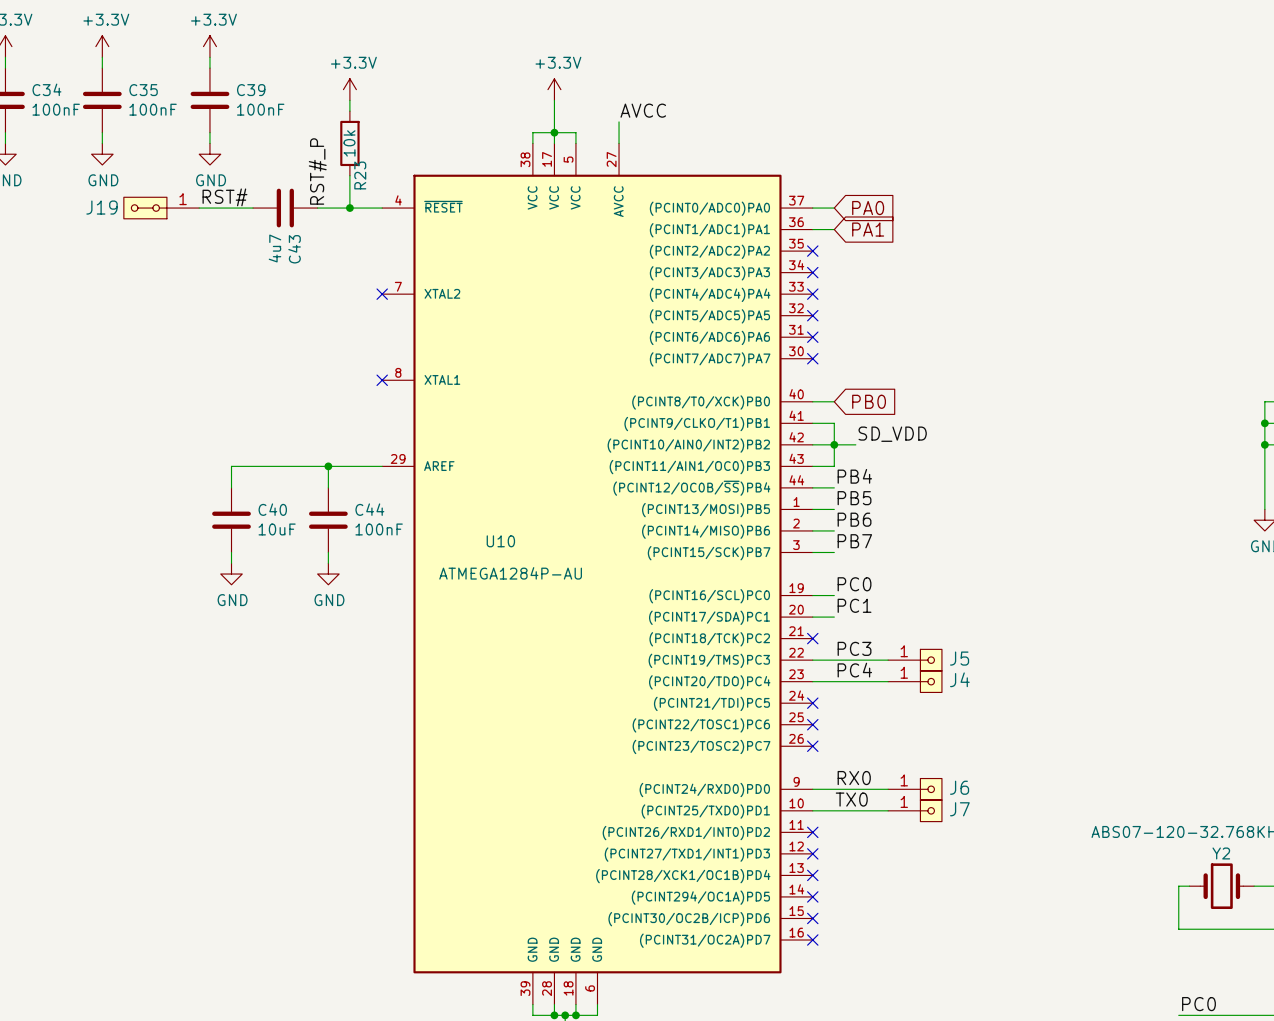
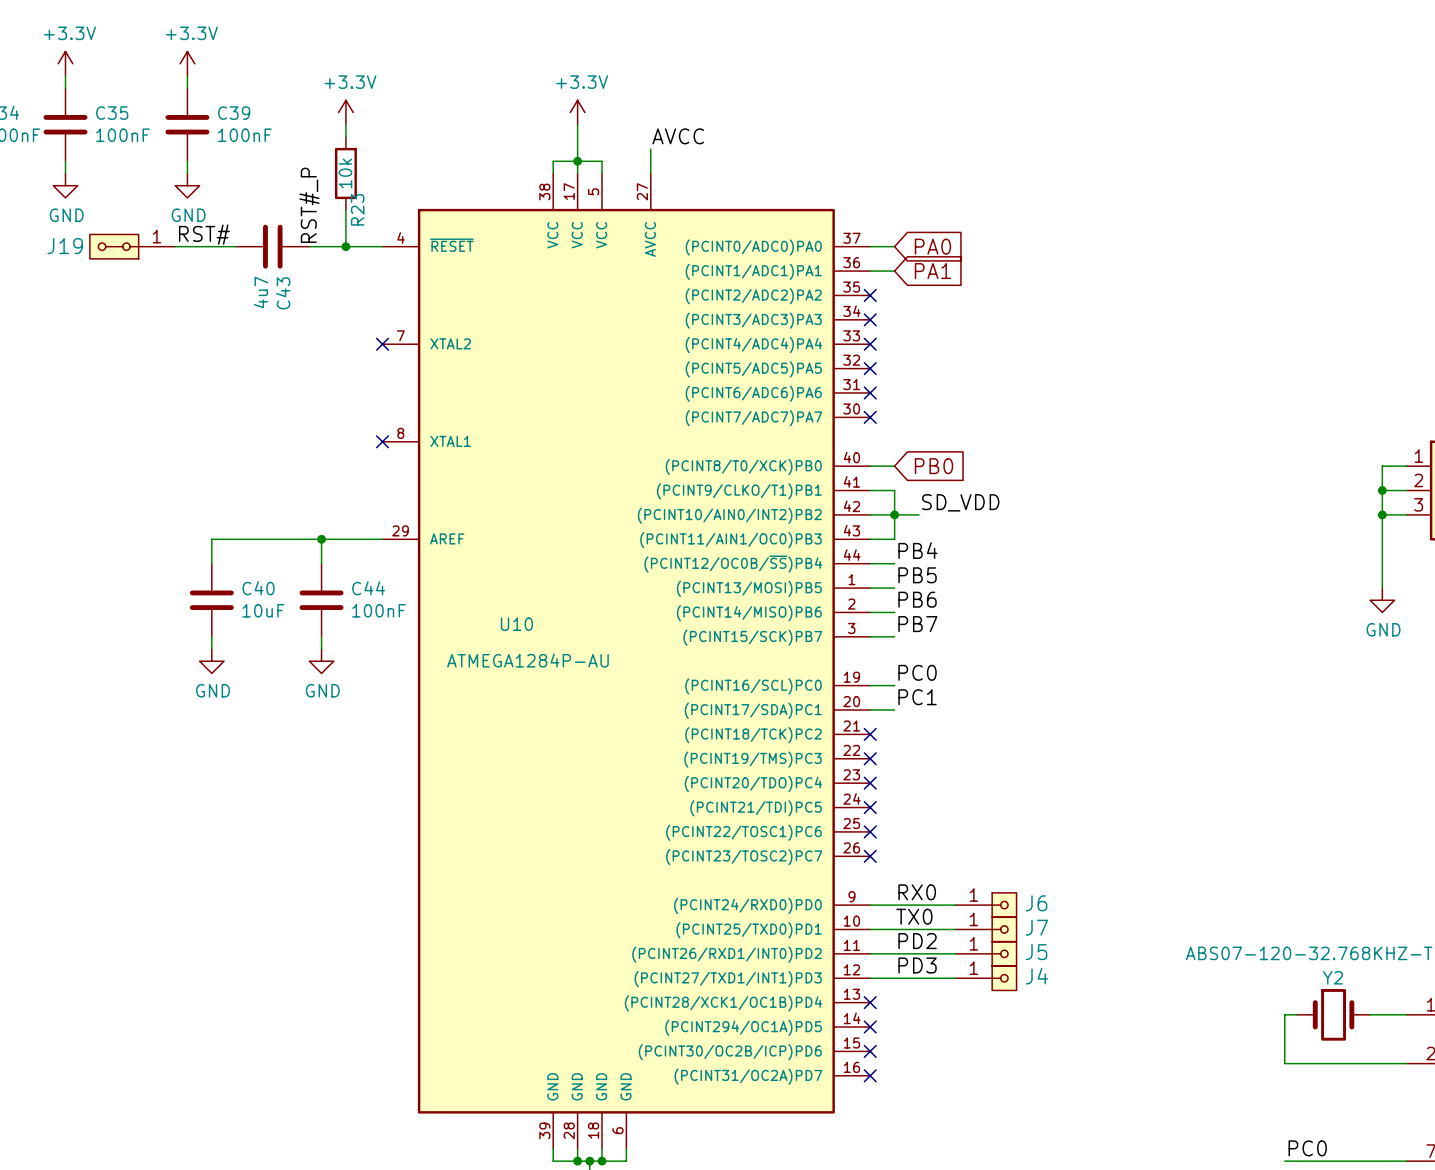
label: PC3 (854, 648) -> none
wire: (812, 660) (888, 660) -> (870, 978) (955, 978)
no-connect mark: none -> (870, 758)
J5 position: (915, 660) -> (986, 953)
label: PC4 (854, 670) -> none
wire: (812, 681) (888, 681) -> (870, 953) (955, 953)
no-connect mark: none -> (870, 783)
J4 position: (915, 681) -> (986, 978)
label: none -> PD2 (917, 941)
no-connect mark: (812, 832) -> none
label: none -> PD3 (917, 965)
no-connect mark: (812, 853) -> none

